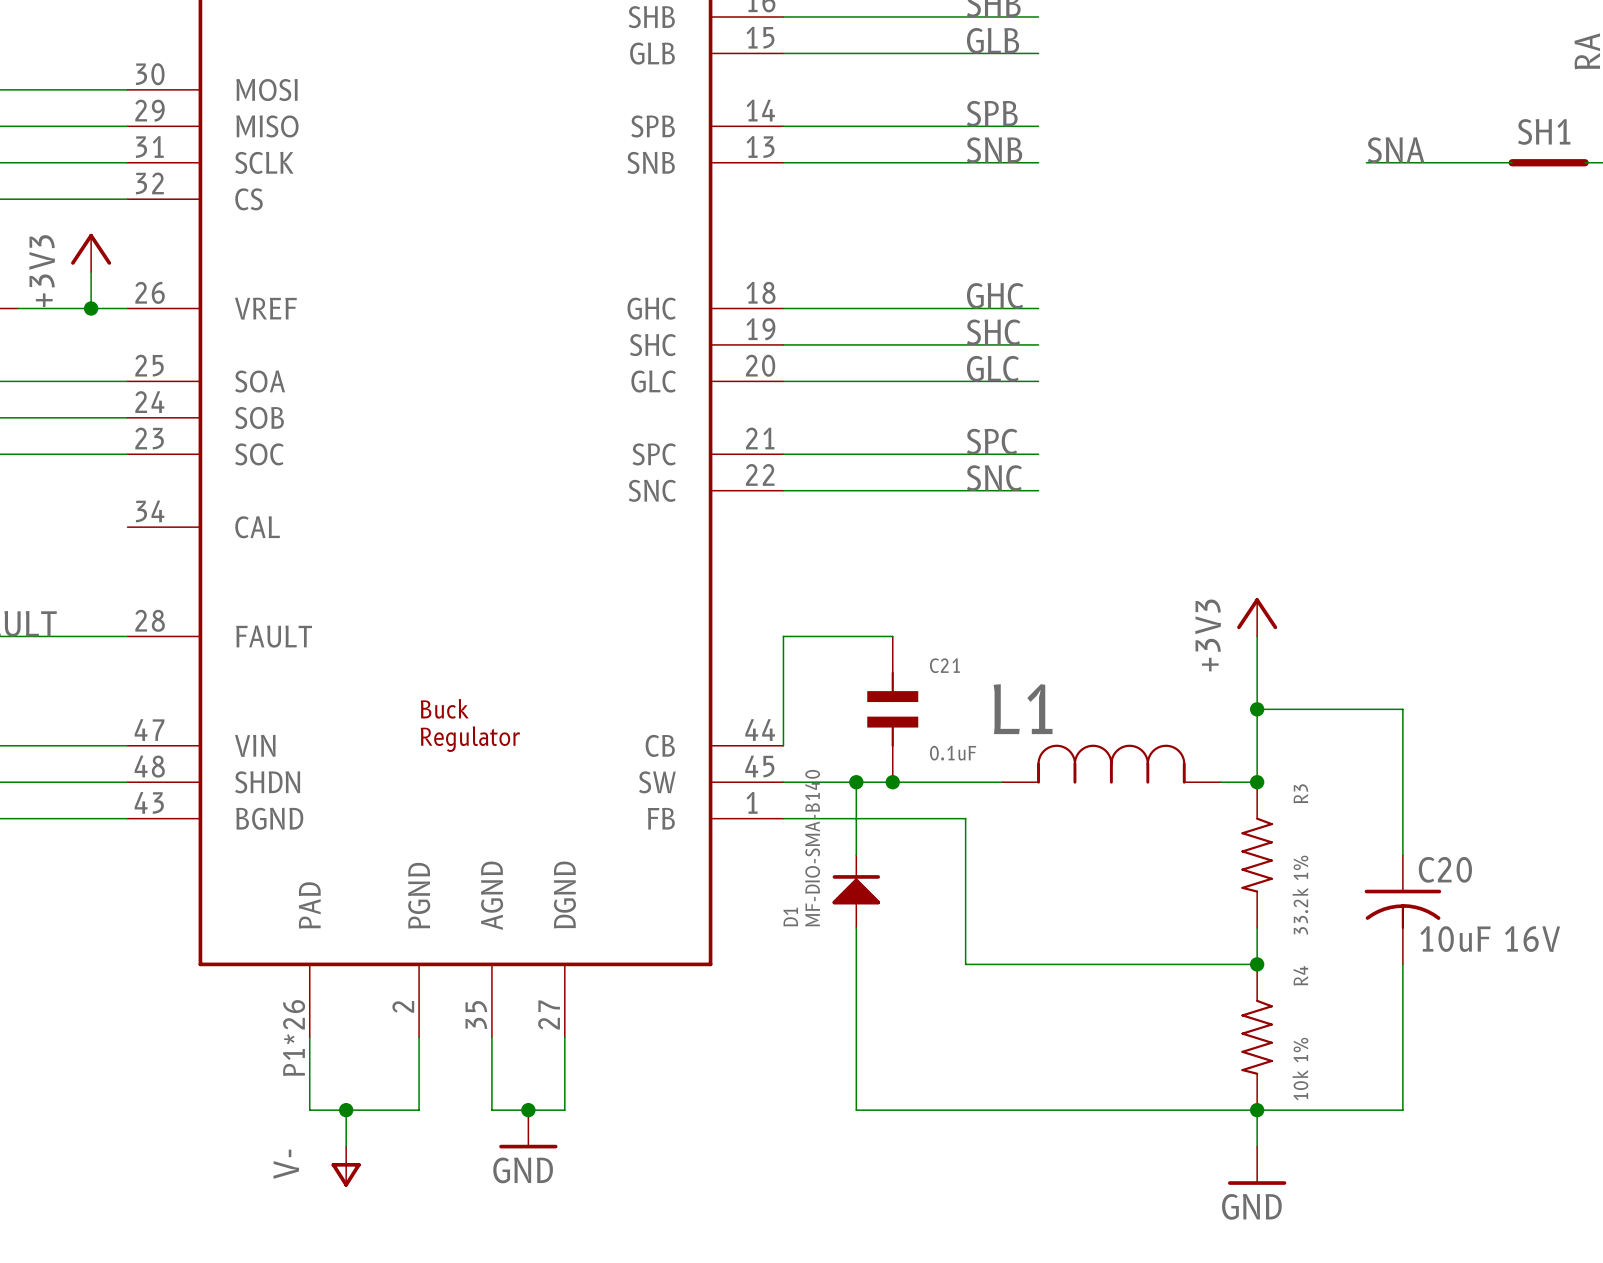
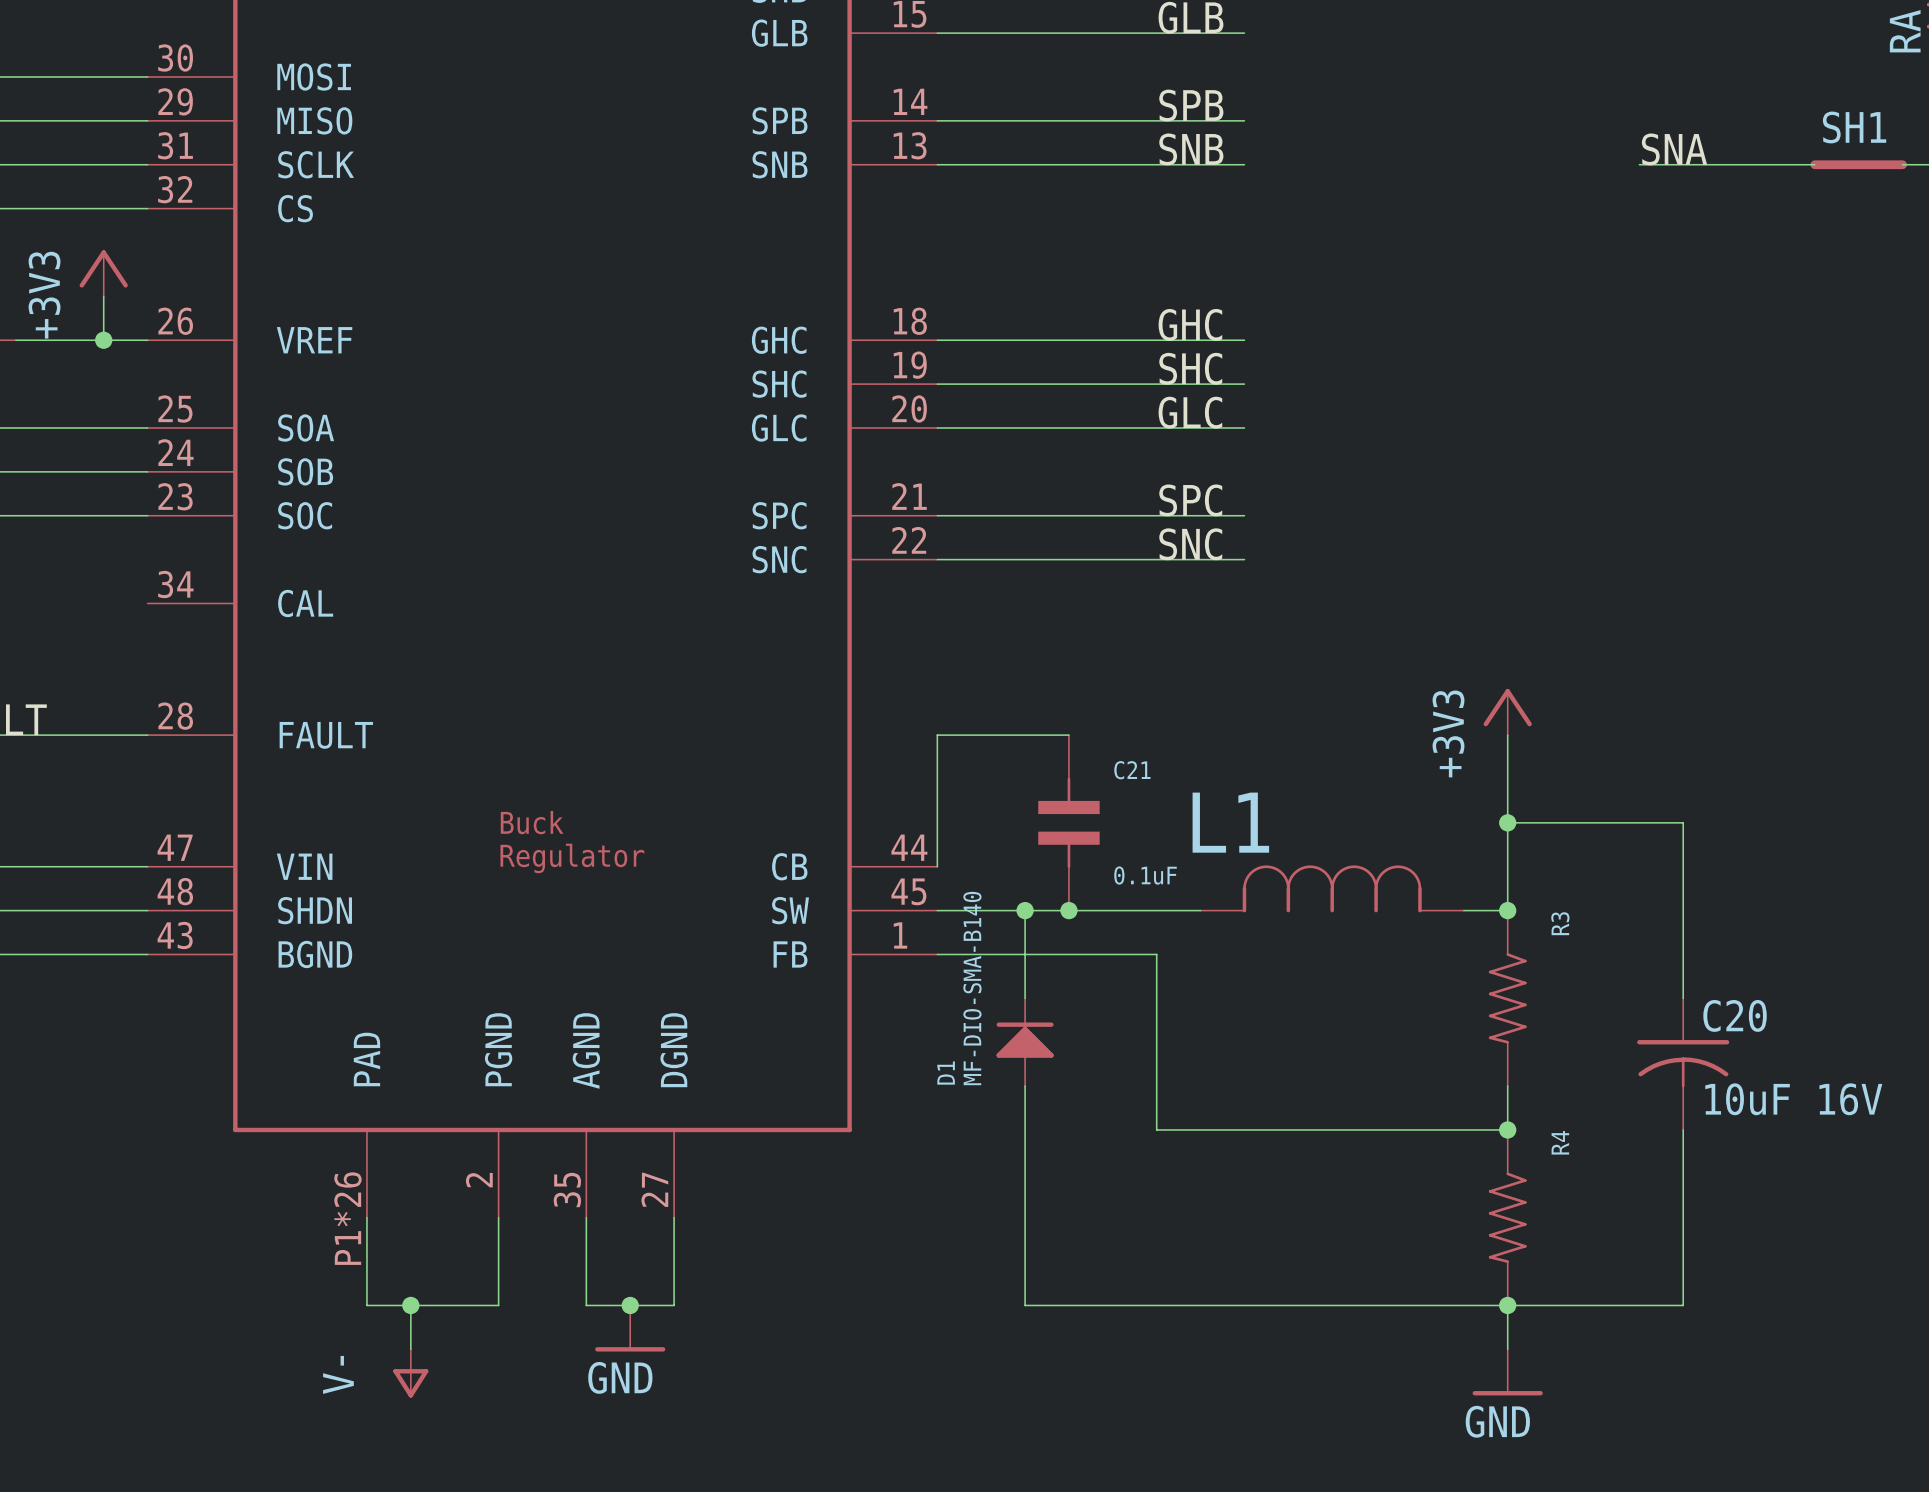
R3 value: 33.2k 1% (1300, 895) -> none
R4 value: 10k 1% (1300, 1069) -> none

